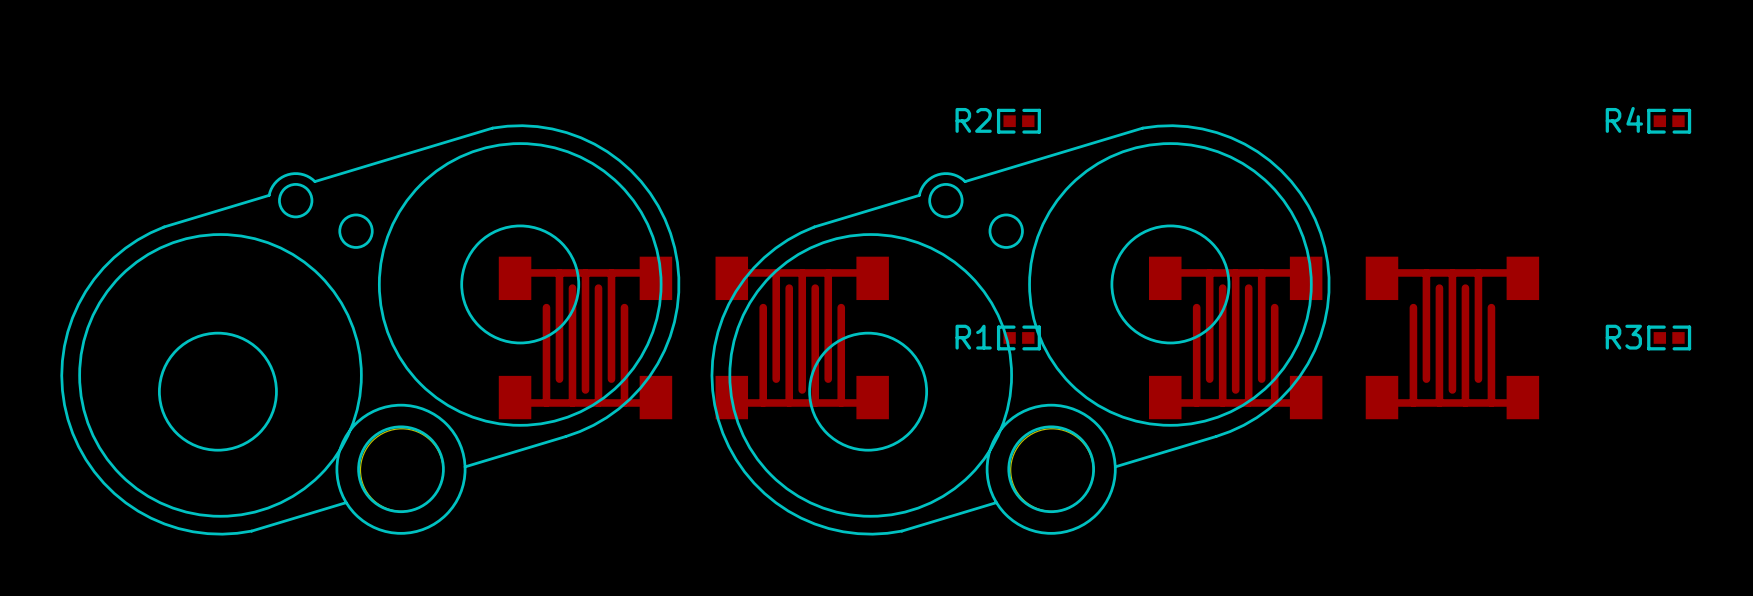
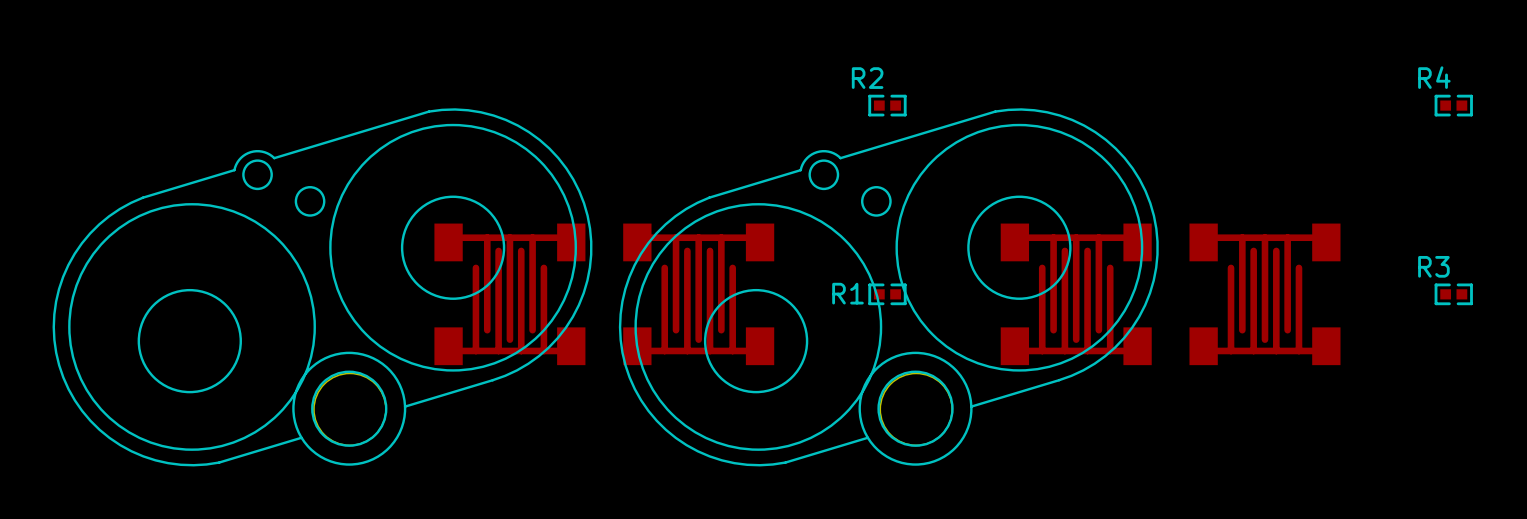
R4 name position: R4 (1624, 119) -> R4 (1434, 77)
R2 name position: R2 (973, 120) -> R2 (867, 78)
R3 name position: R3 (1623, 337) -> R3 (1433, 266)

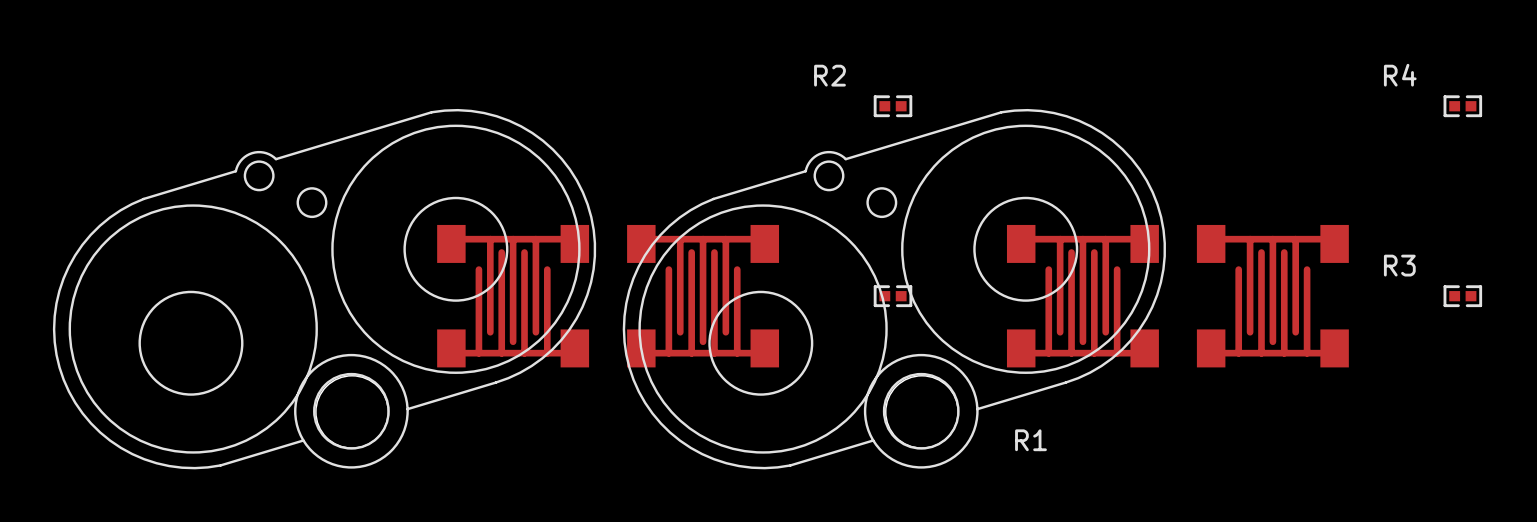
R4 name position: R4 (1434, 77) -> R4 (1400, 75)
R2 name position: R2 (867, 78) -> R2 (829, 75)
R3 name position: R3 (1433, 266) -> R3 (1399, 265)
R1 name position: R1 (847, 293) -> R1 (1030, 440)

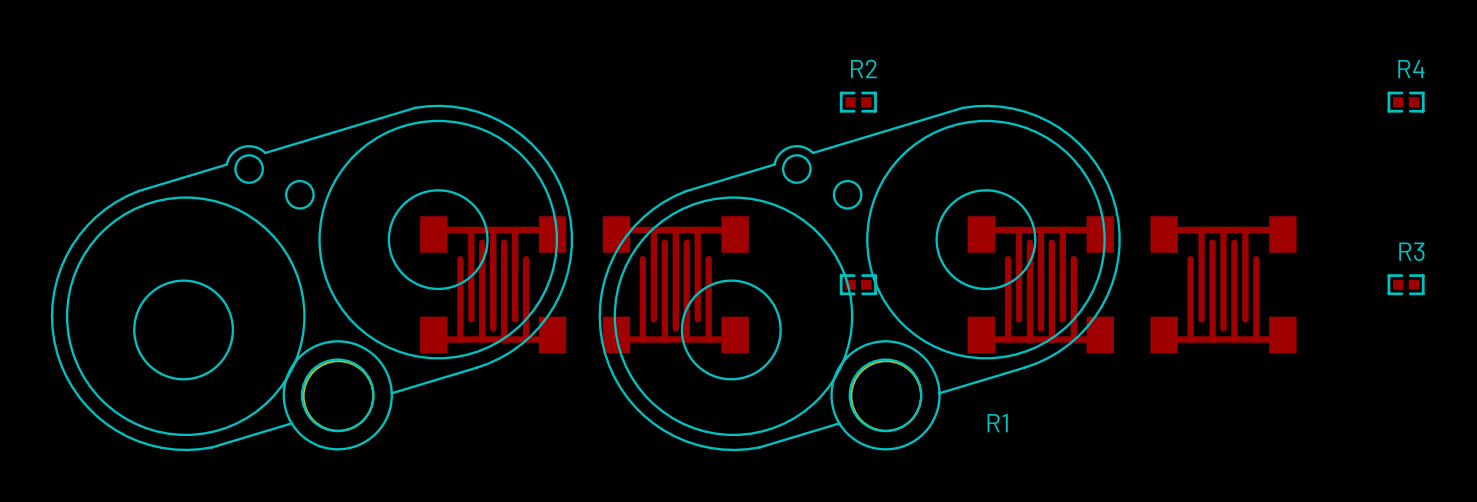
R2 name position: R2 (829, 75) -> R2 (863, 68)
R4 name position: R4 (1400, 75) -> R4 (1411, 69)
R3 name position: R3 (1399, 265) -> R3 (1411, 251)

